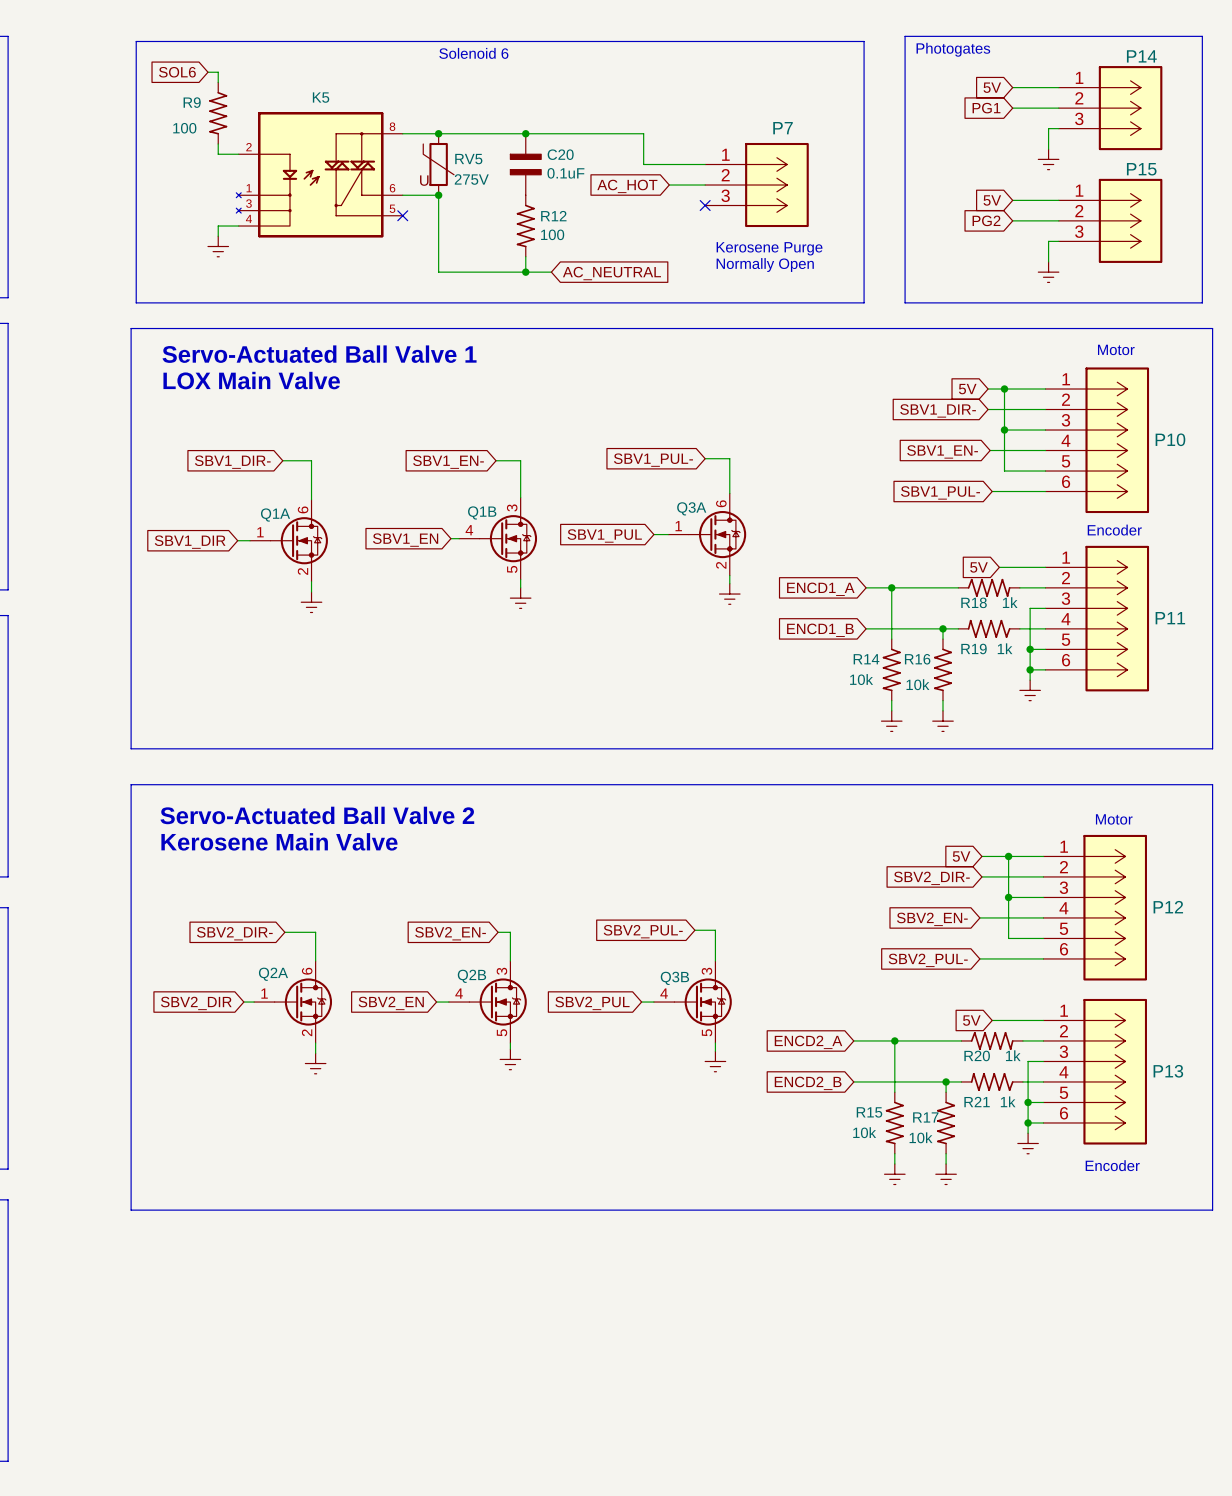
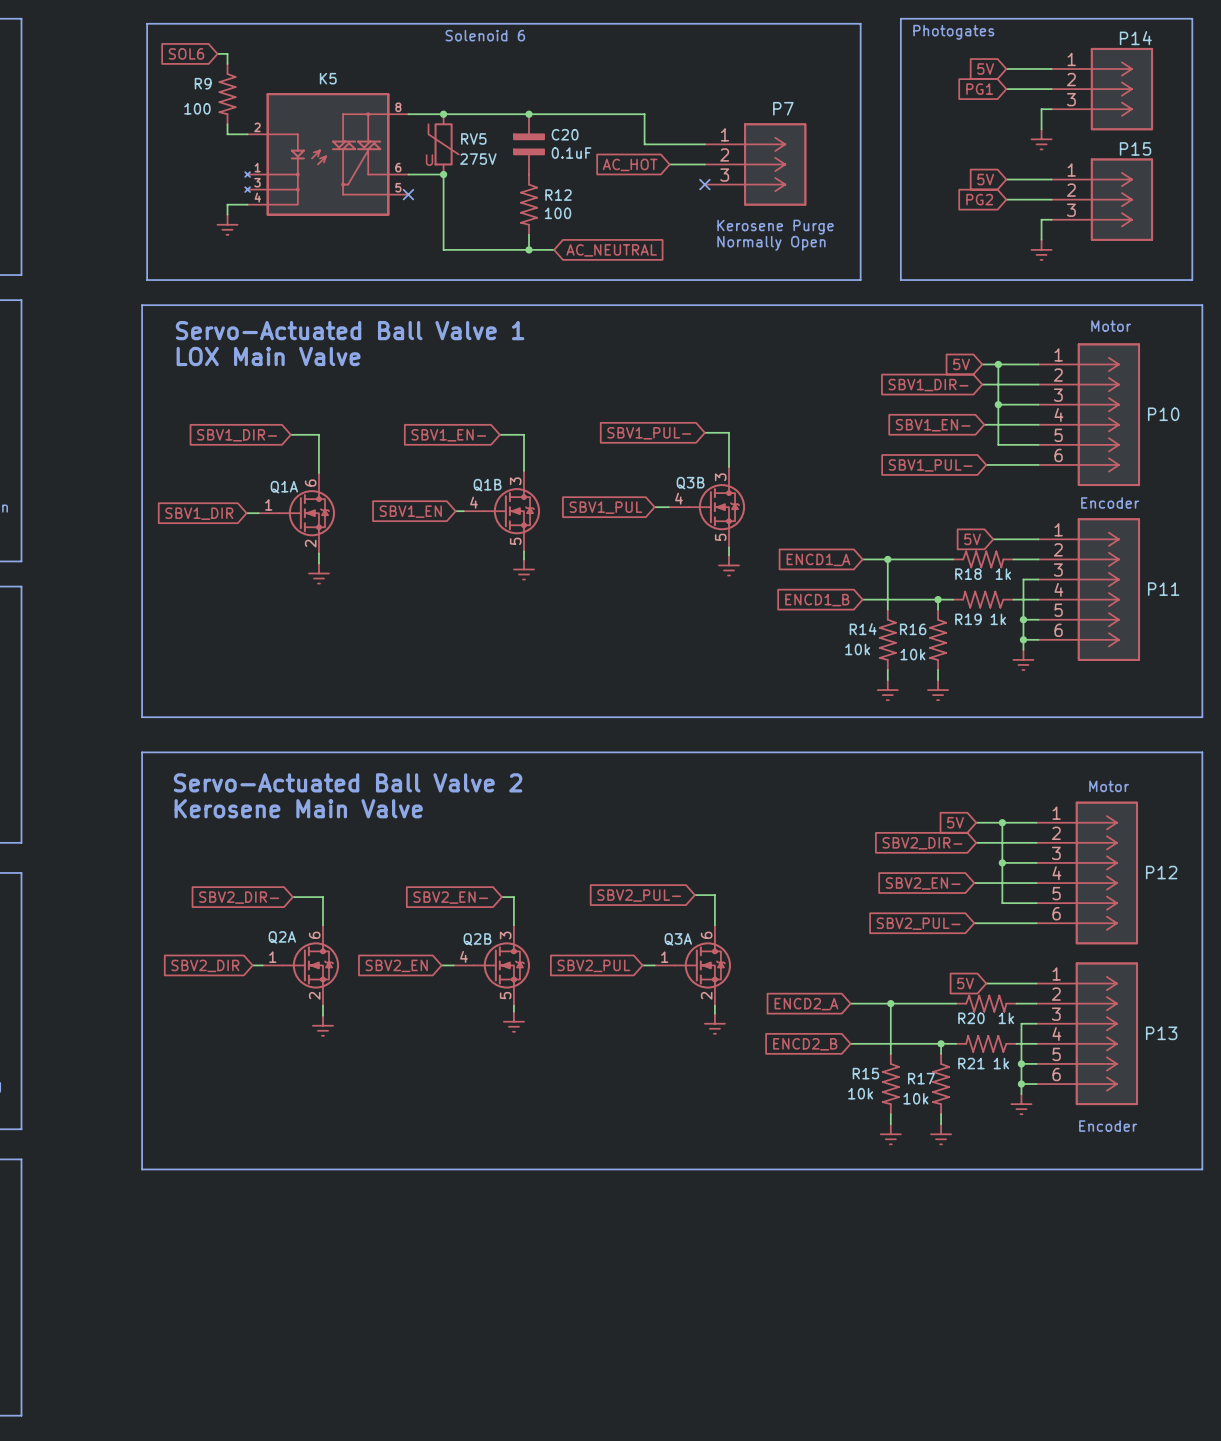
Q3A position: (707, 534) -> (692, 965)
Q3B position: (692, 1002) -> (706, 507)

